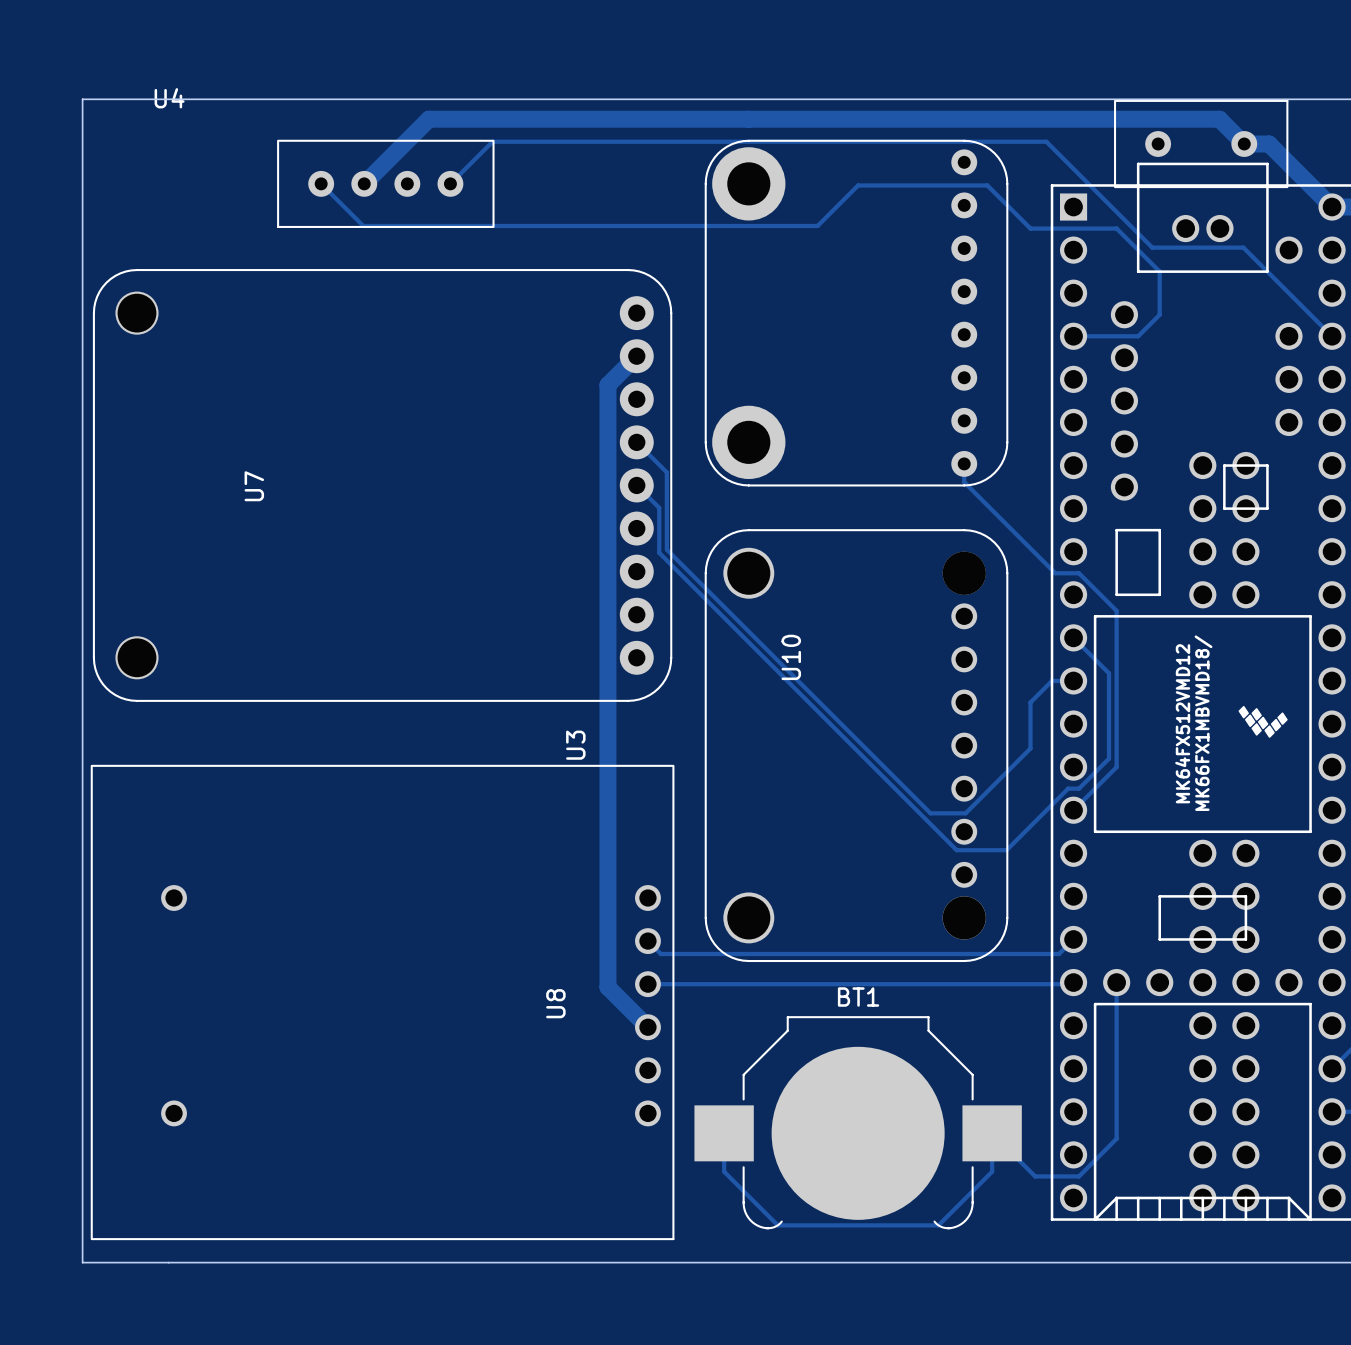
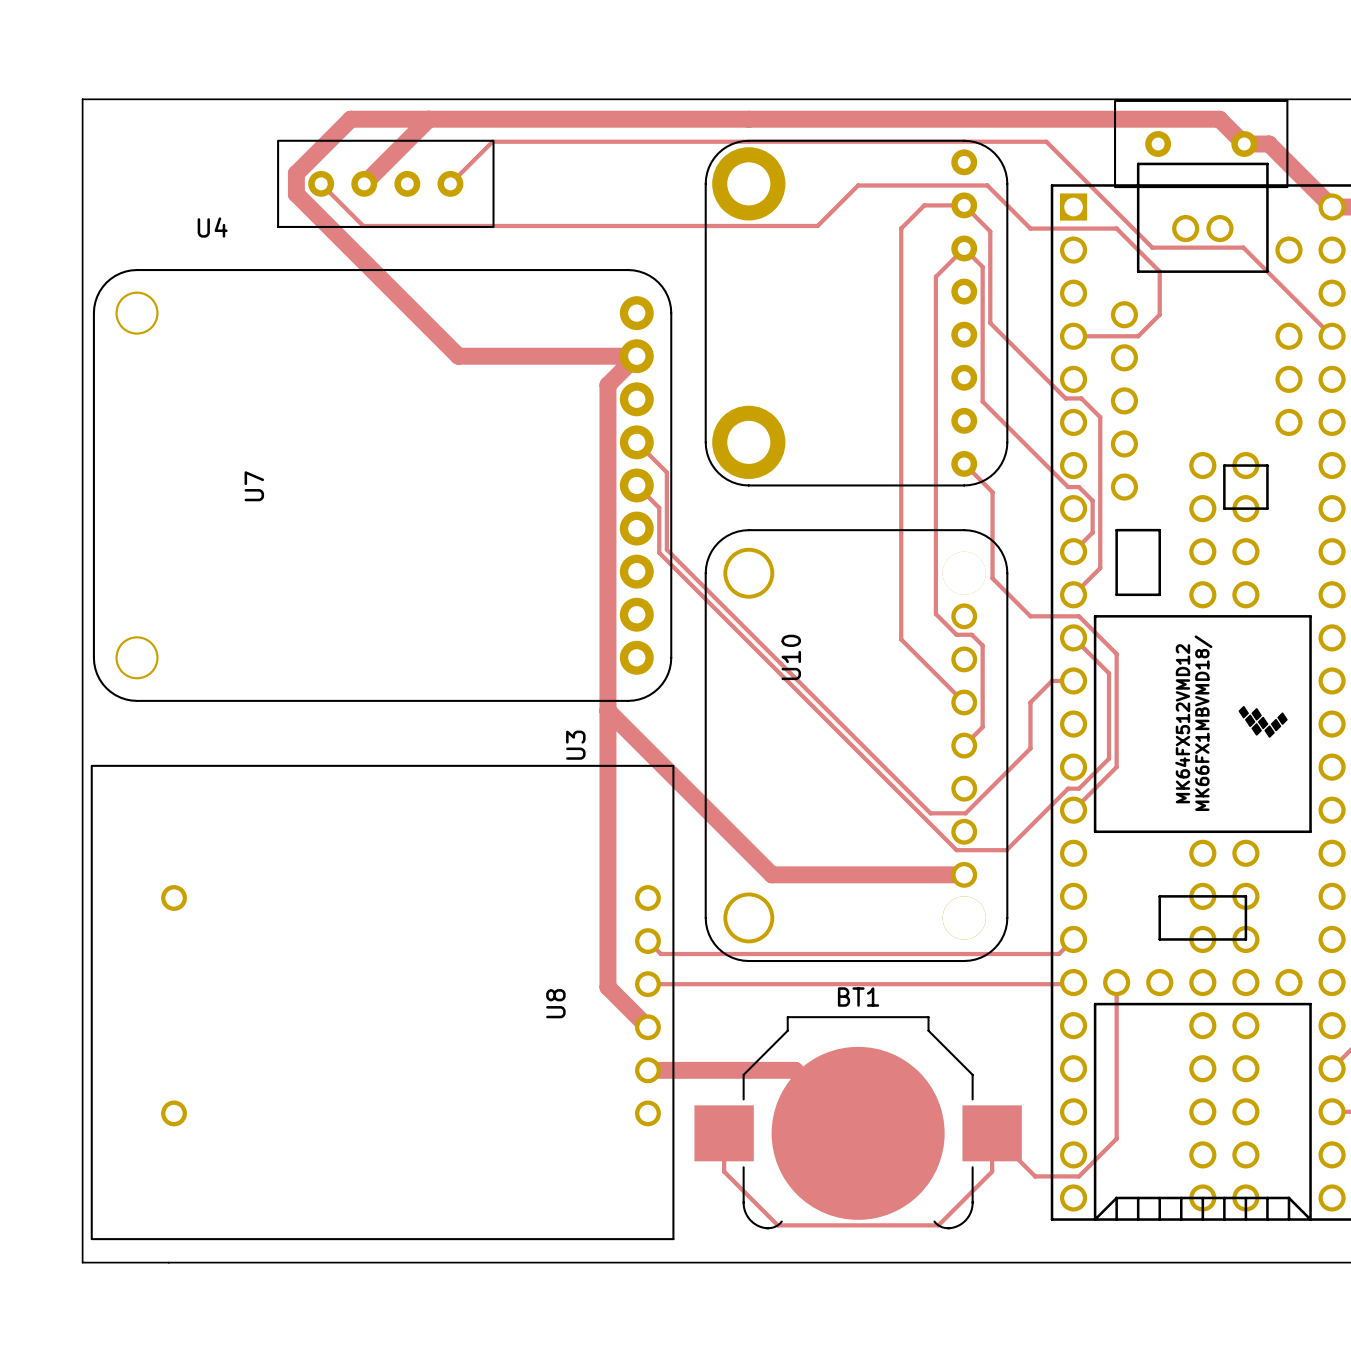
U4 name position: U4 (169, 98) -> U4 (212, 227)
track: none -> (428, 119) (350, 119) (296, 173) (296, 194) (458, 356) (636, 356)
track: (964, 463) (964, 482) (1055, 573) (1078, 573) (1116, 610) (1116, 653) -> (964, 463) (992, 492) (992, 578) (1030, 616) (1078, 616) (1116, 653)
track: none -> (1073, 551) (1092, 532) (1092, 500) (1078, 487) (1068, 487) (982, 401) (982, 266) (964, 248) (935, 276) (935, 614) (956, 634) (971, 634) (982, 645) (982, 727) (964, 745)
track: none -> (1073, 594) (1100, 568) (1100, 417) (1081, 398) (1065, 398) (990, 323) (990, 231) (964, 205) (924, 205) (901, 228) (901, 639) (964, 702)
track: none -> (607, 710) (771, 874) (964, 874)
track: none -> (647, 1070) (795, 1070) (858, 1133)

